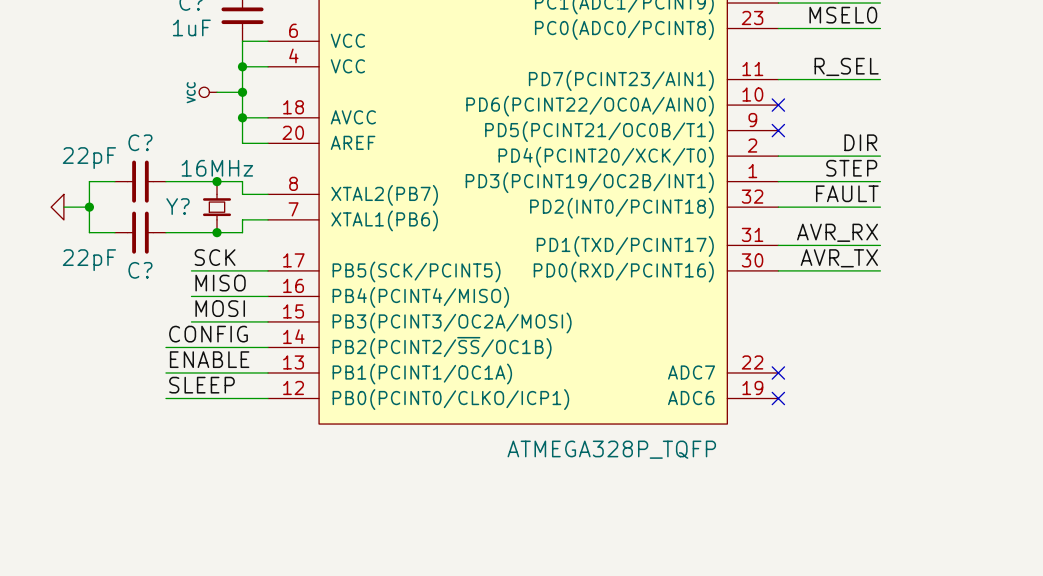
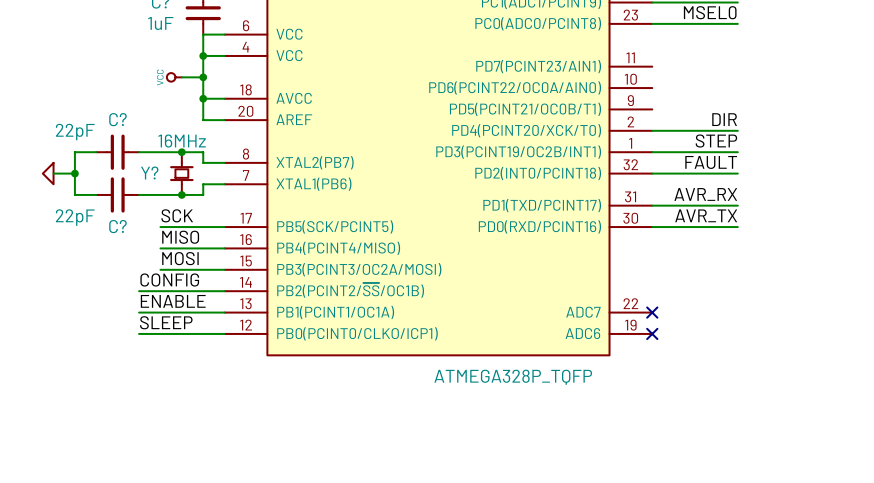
label: R_SEL (846, 66) -> none
wire: (778, 79) (880, 79) -> none
no-connect mark: (778, 105) -> none
no-connect mark: (778, 130) -> none

